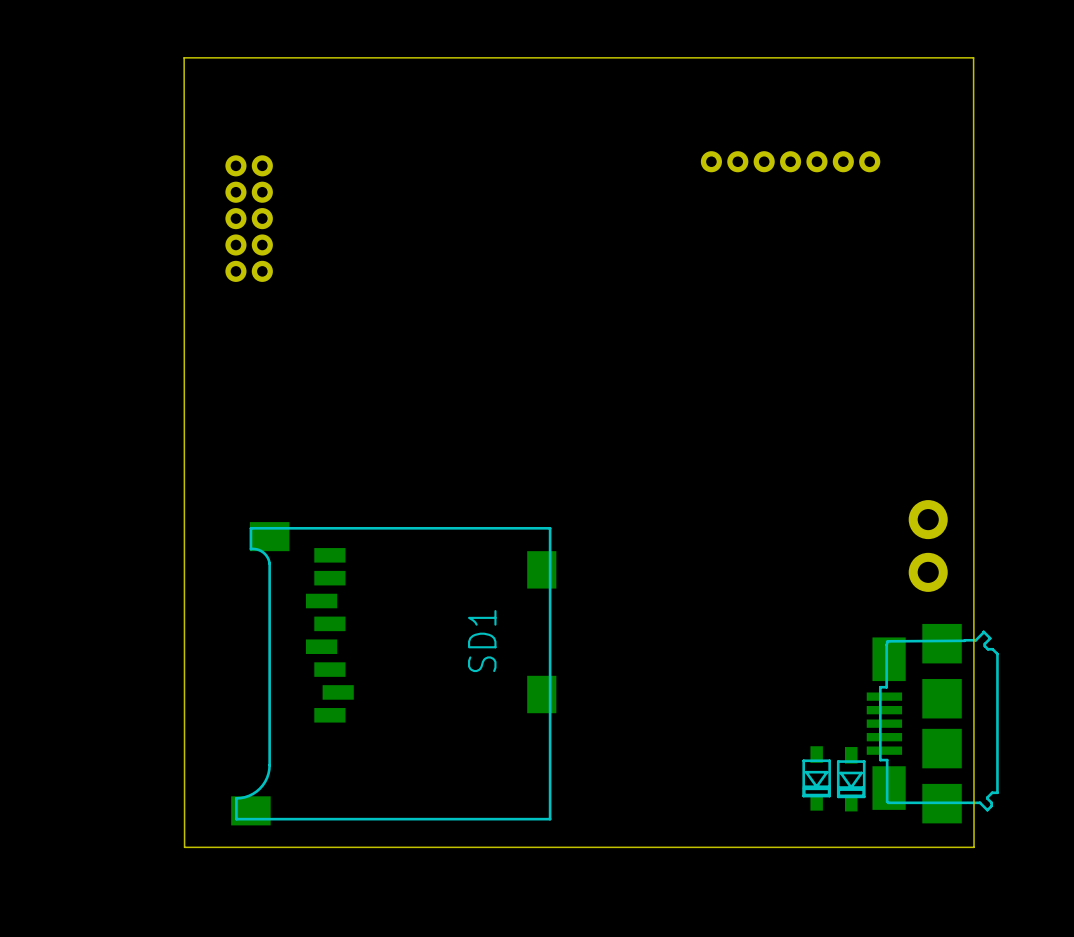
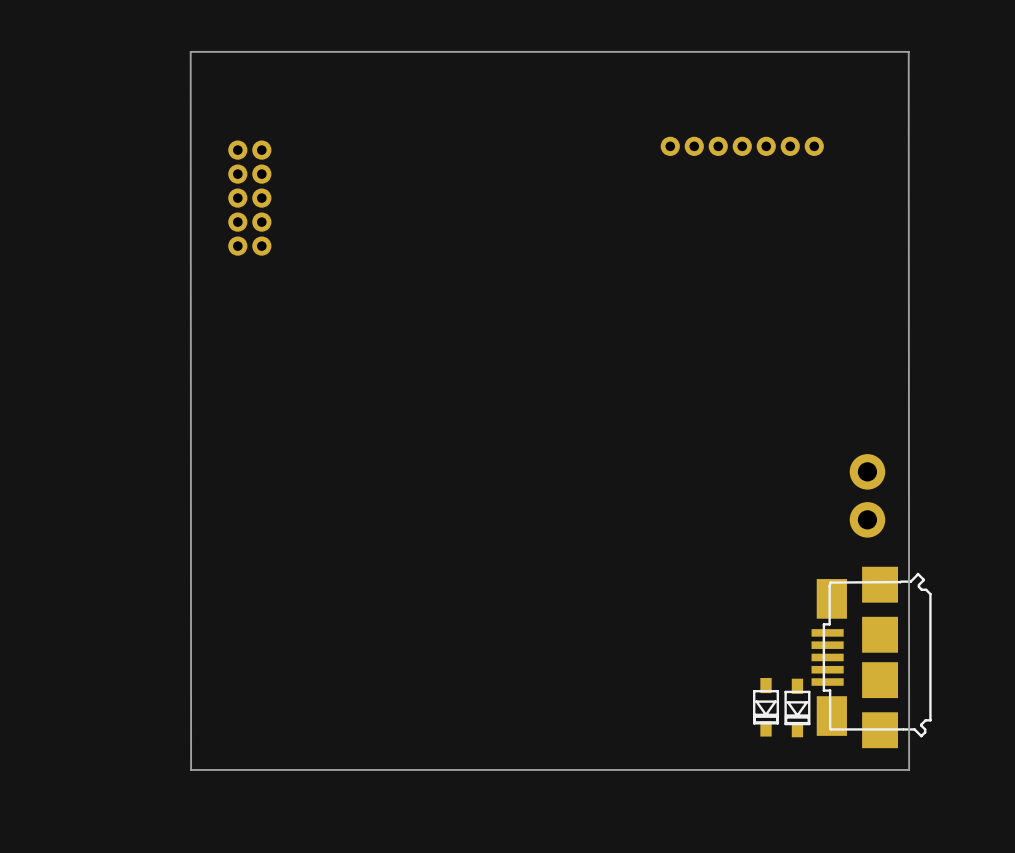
SD1: (393, 673) -> none

